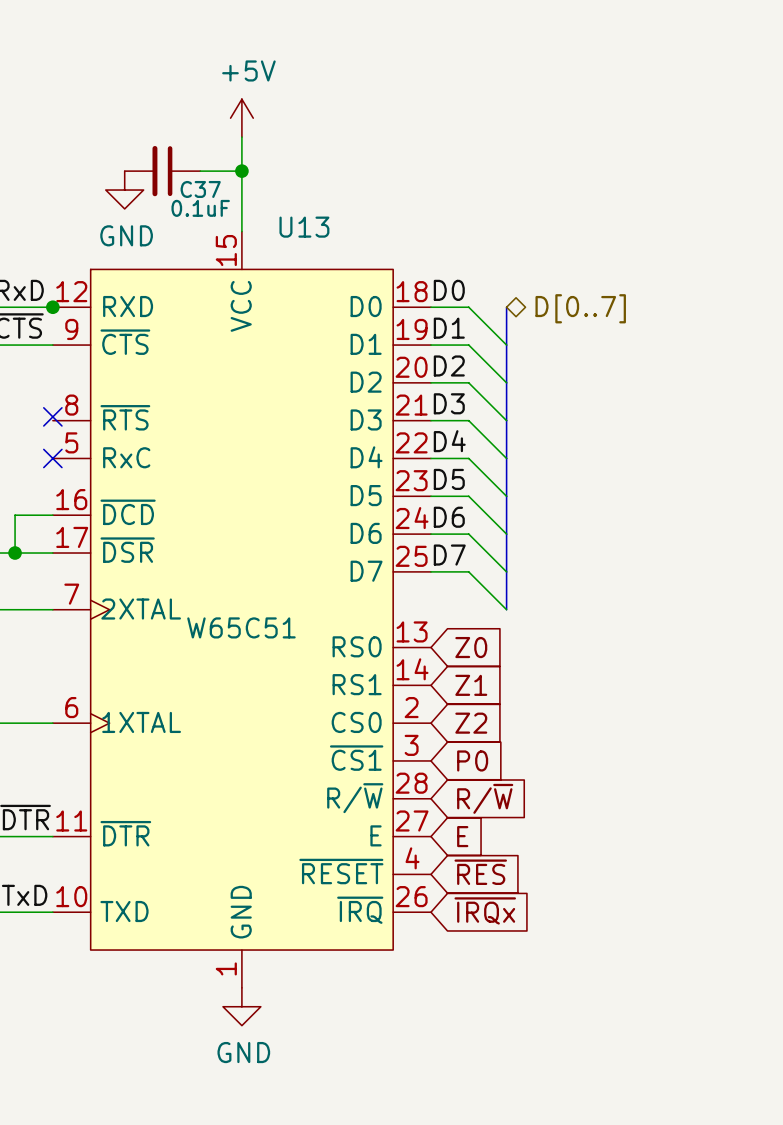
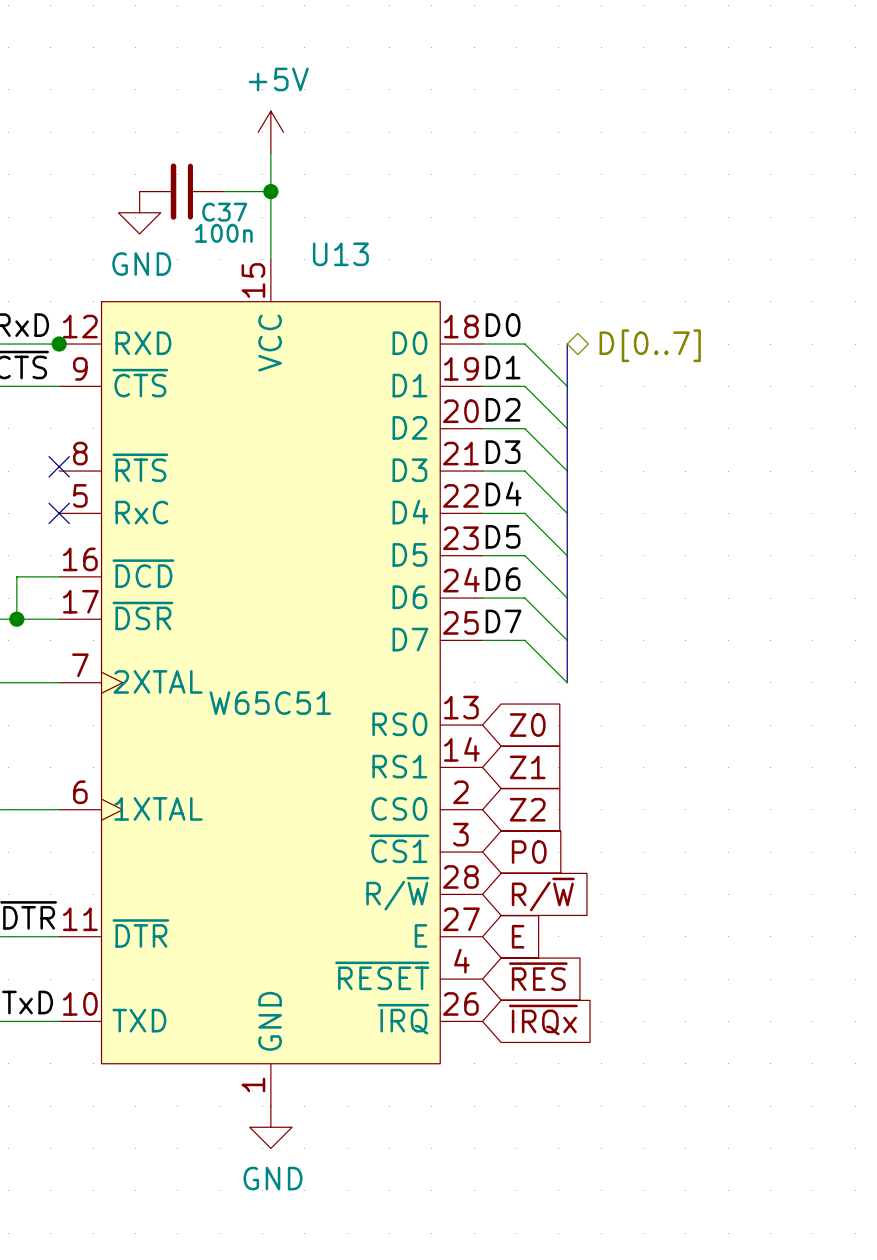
C37 value: 0.1uF (200, 208) -> 100n (223, 233)

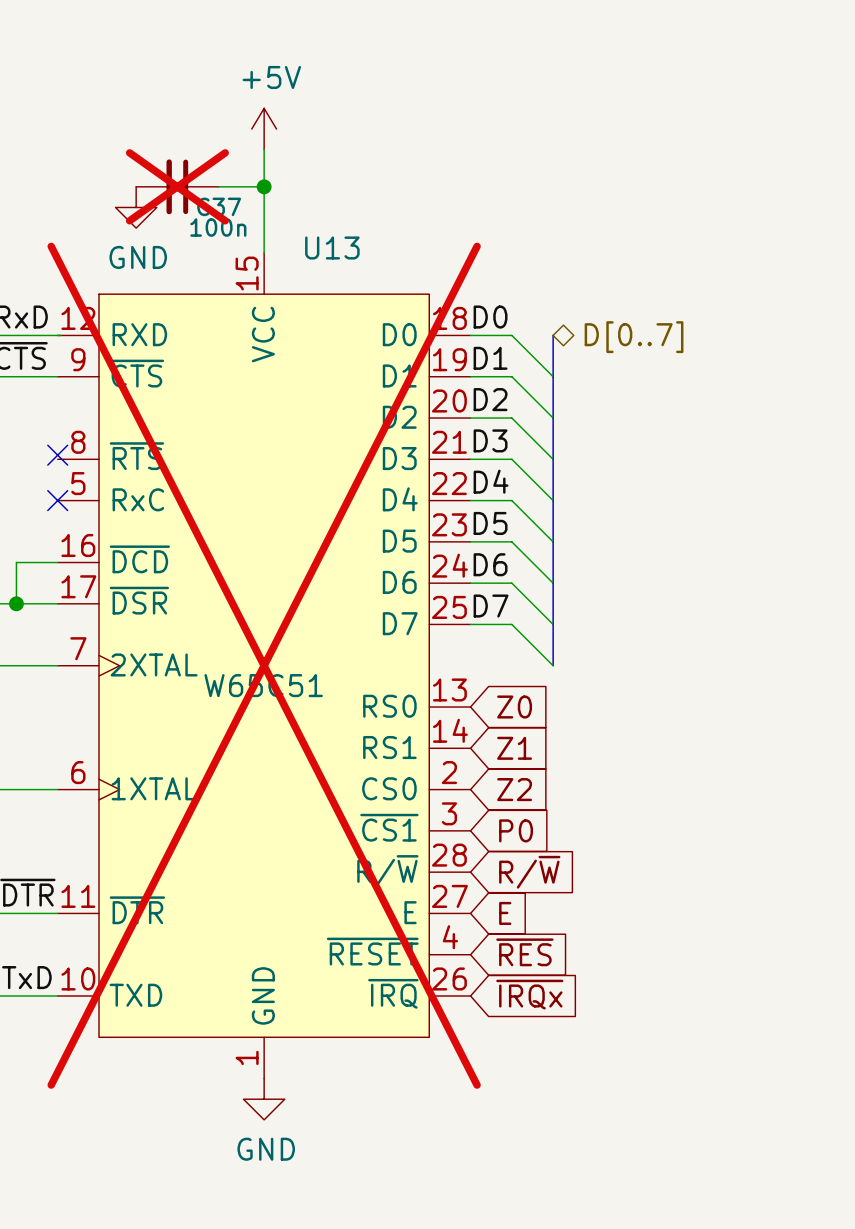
C37 do-not-place cross: none -> (177, 186)
junction: (59, 344) -> none
U13 do-not-place cross: none -> (264, 665)

